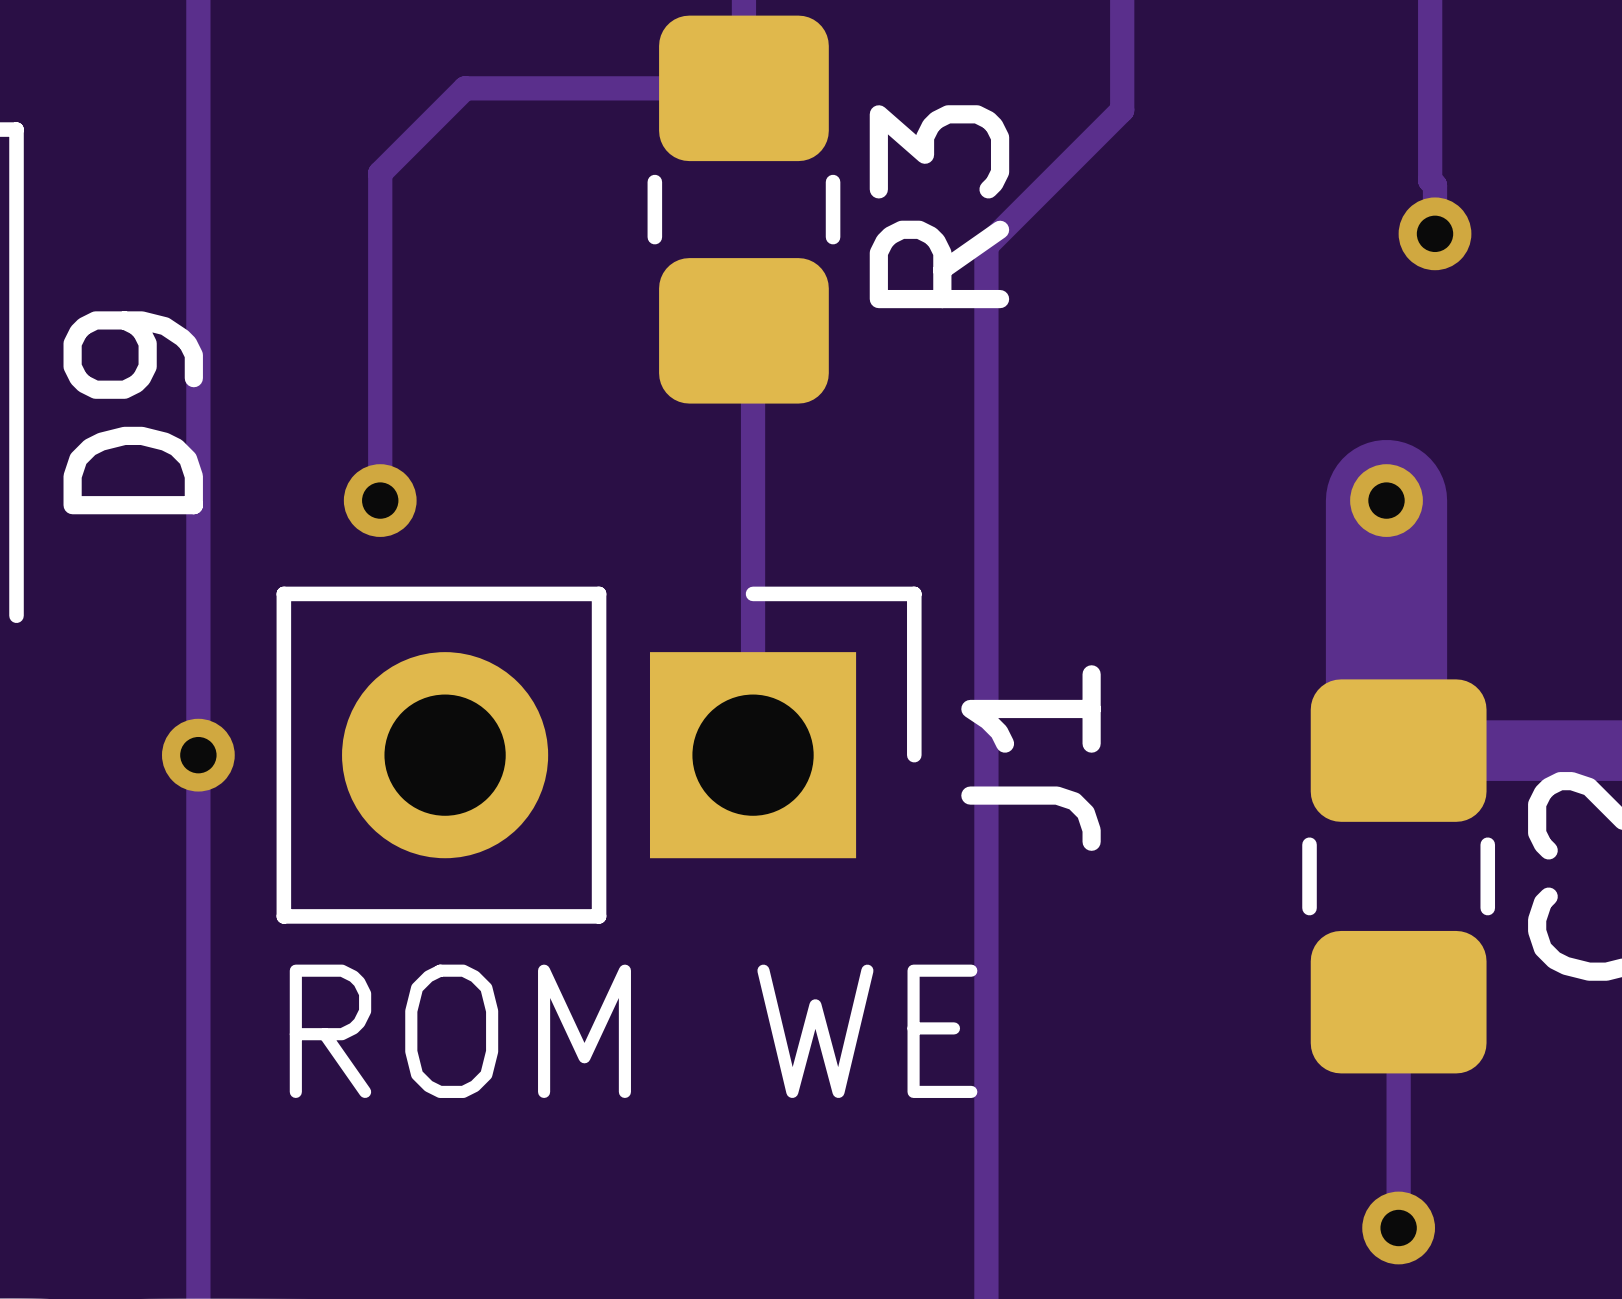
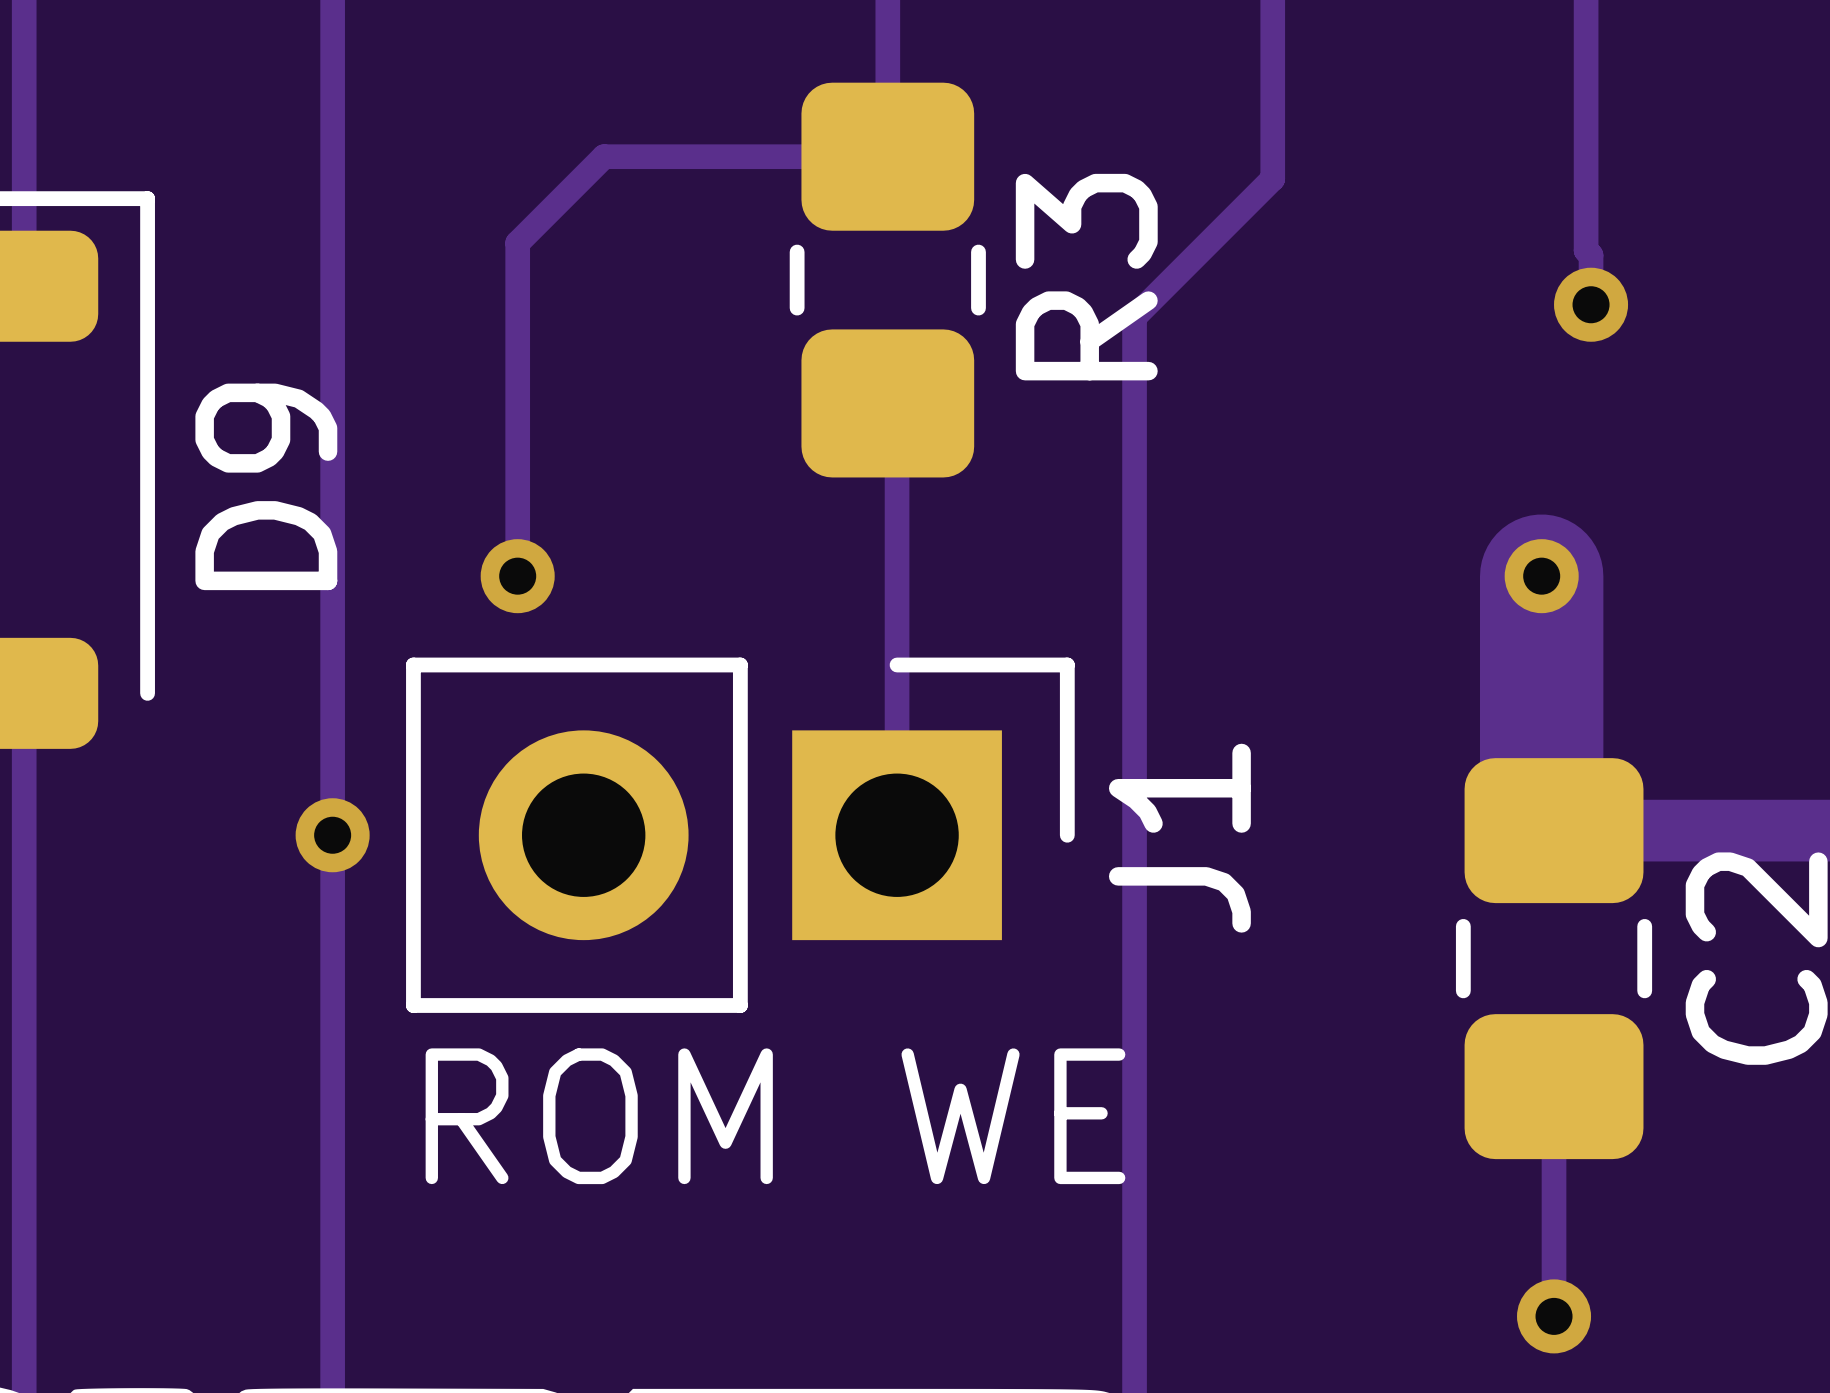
J1 footprint: [276, 586, 922, 924] -> [406, 657, 1075, 1013]

